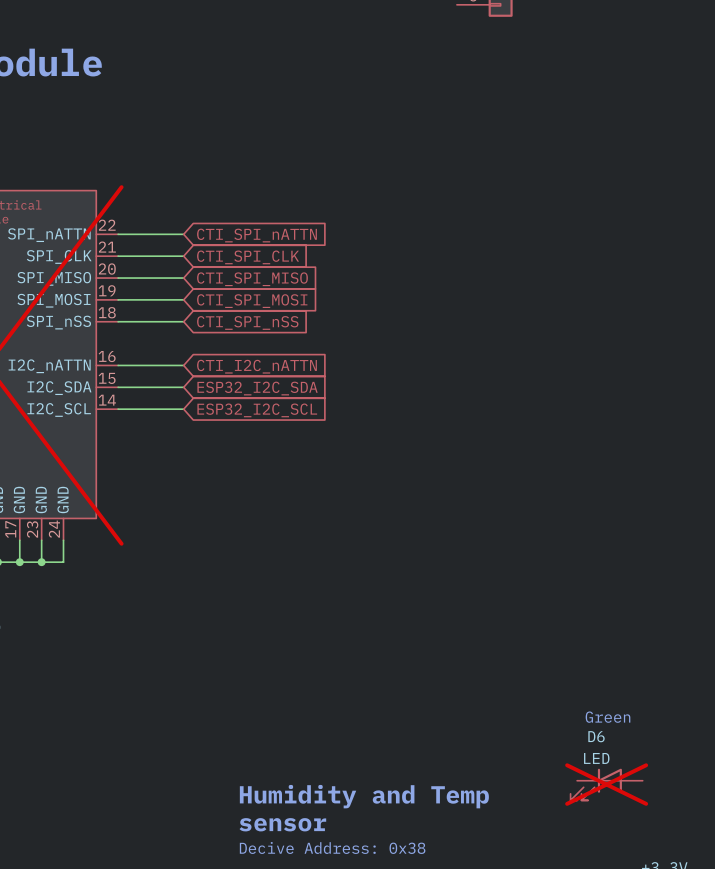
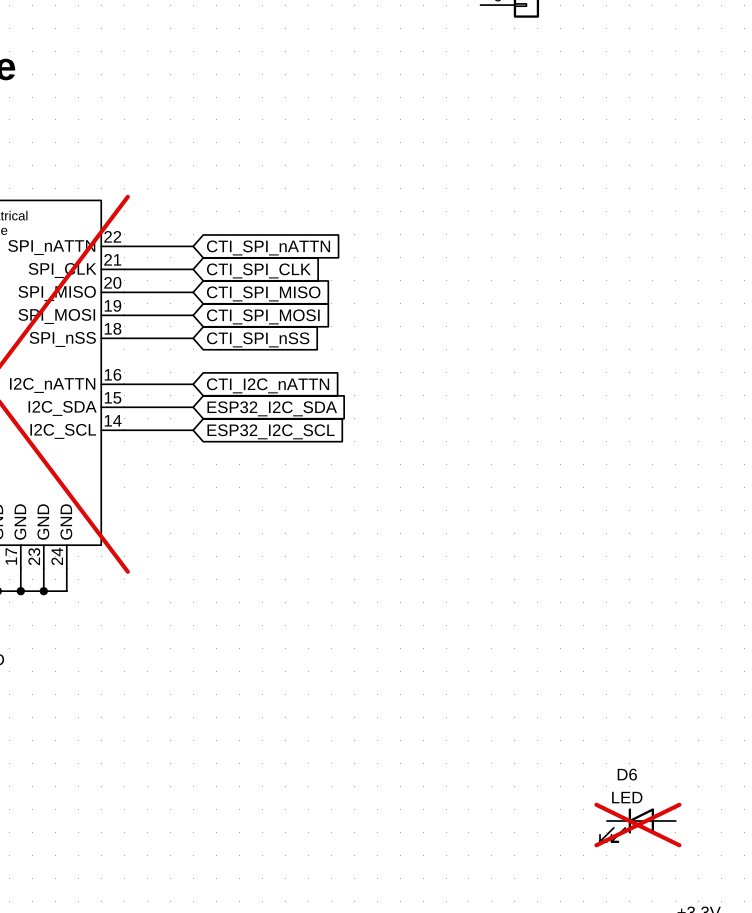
text: Green (608, 717) -> none
text: Humidity and Temp (364, 796) -> none
text: sensor (282, 824) -> none
text: Decive Address: 0x38 (332, 847) -> none

